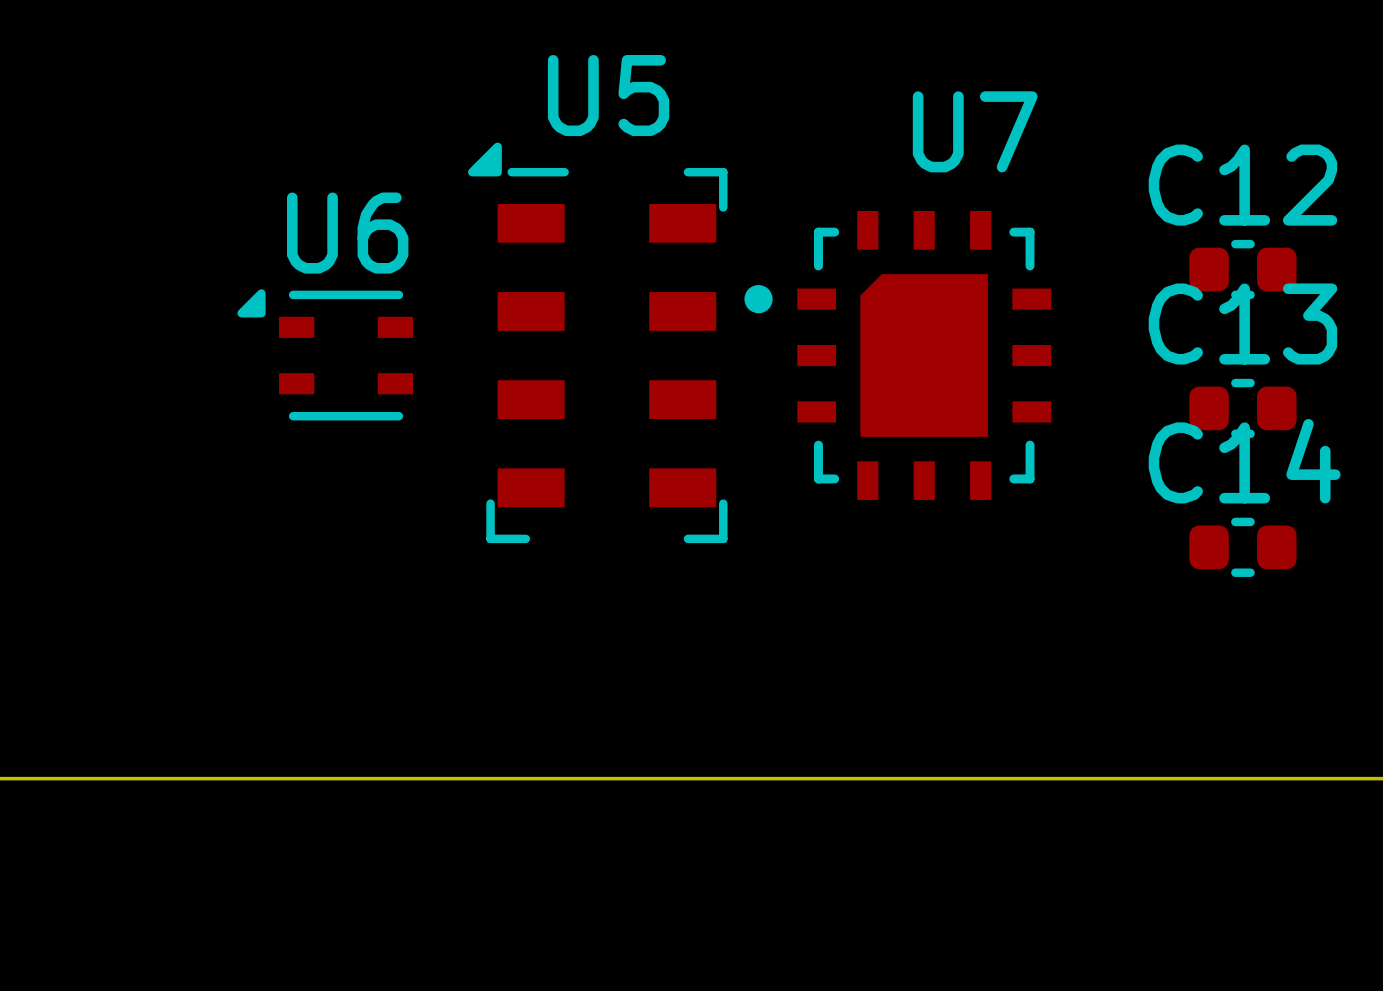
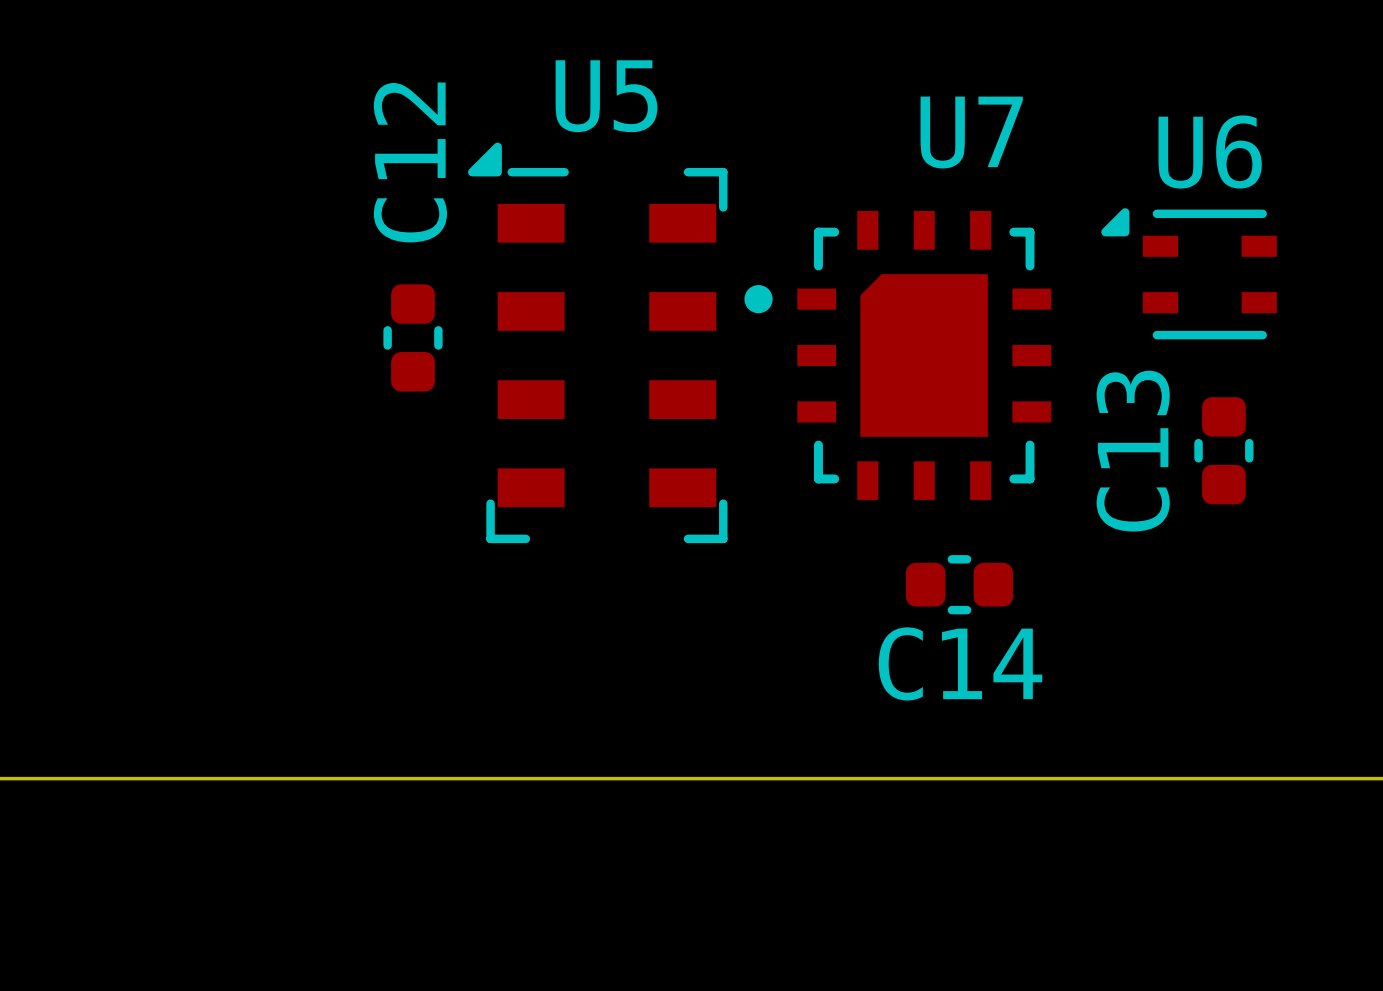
C12 rotation: 0° (1242, 269) -> 90° clockwise (413, 337)
C12 position: (1242, 269) -> (413, 337)
U6 position: (325, 354) -> (1189, 273)
C13 rotation: 0° (1242, 408) -> 90° clockwise (1223, 450)
C14 name position: C14 (1244, 461) -> C14 (960, 663)
C14 position: (1242, 547) -> (959, 584)

